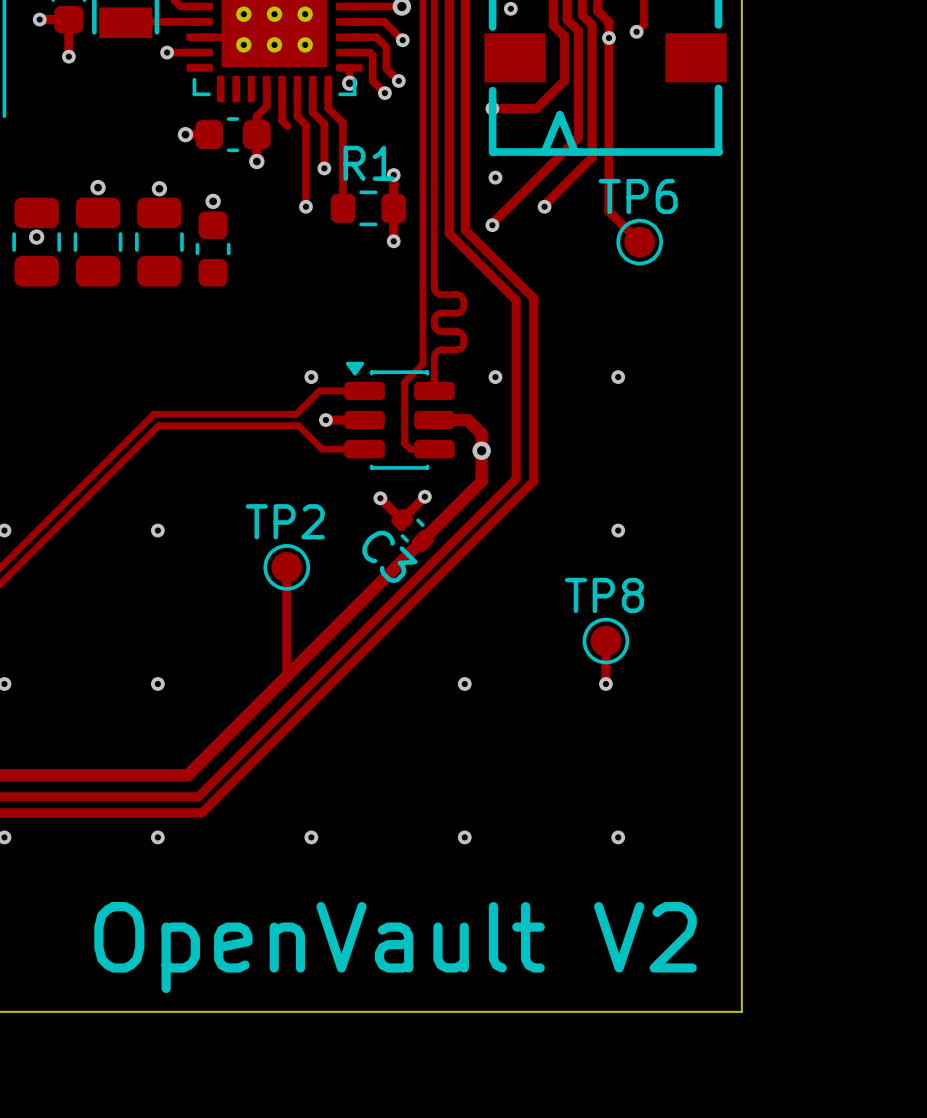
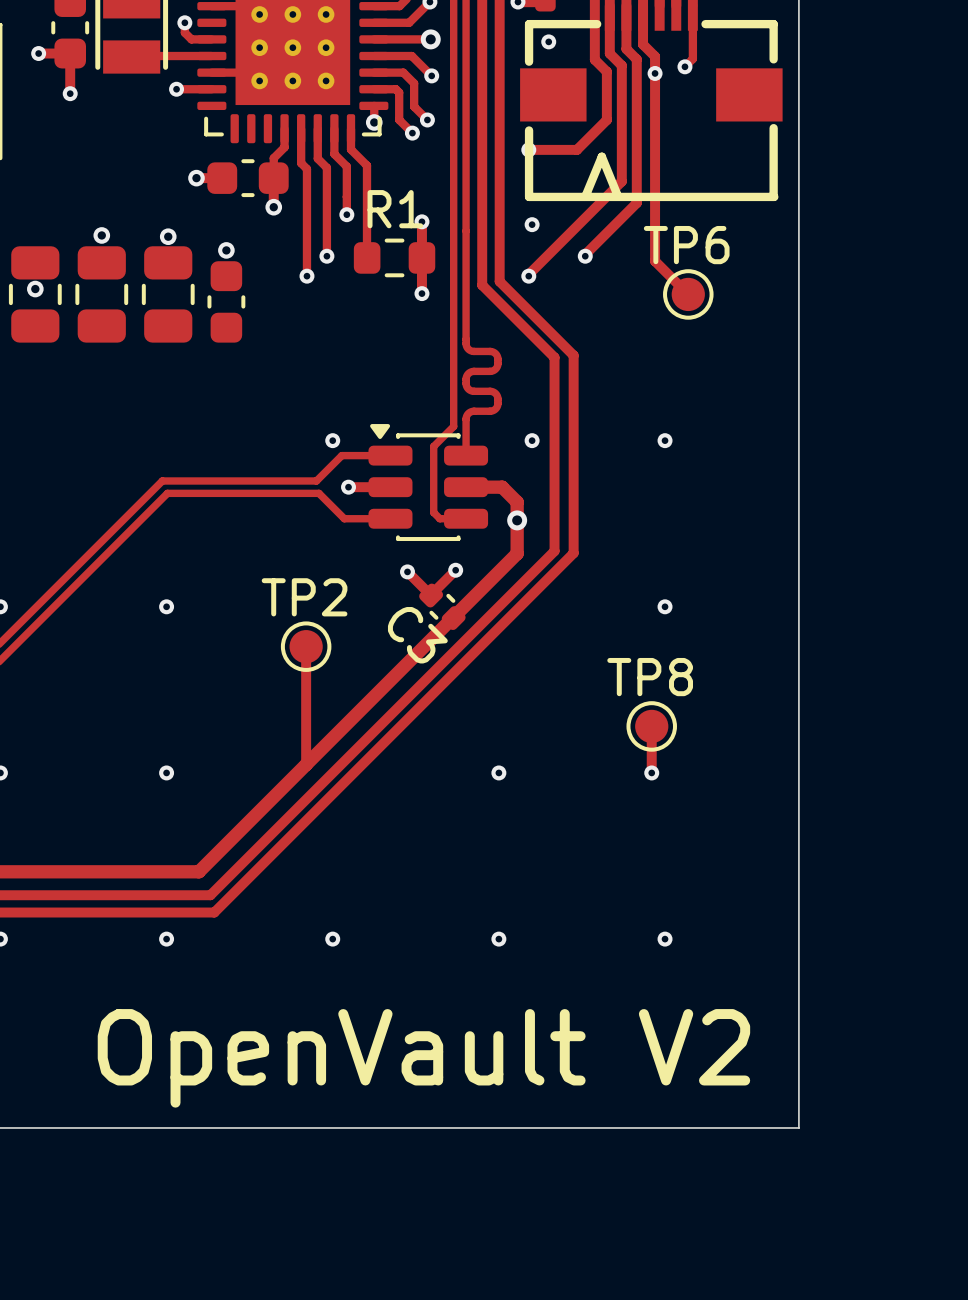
track: none -> (306, 169) (306, 276)
via: none -> (306, 276)

